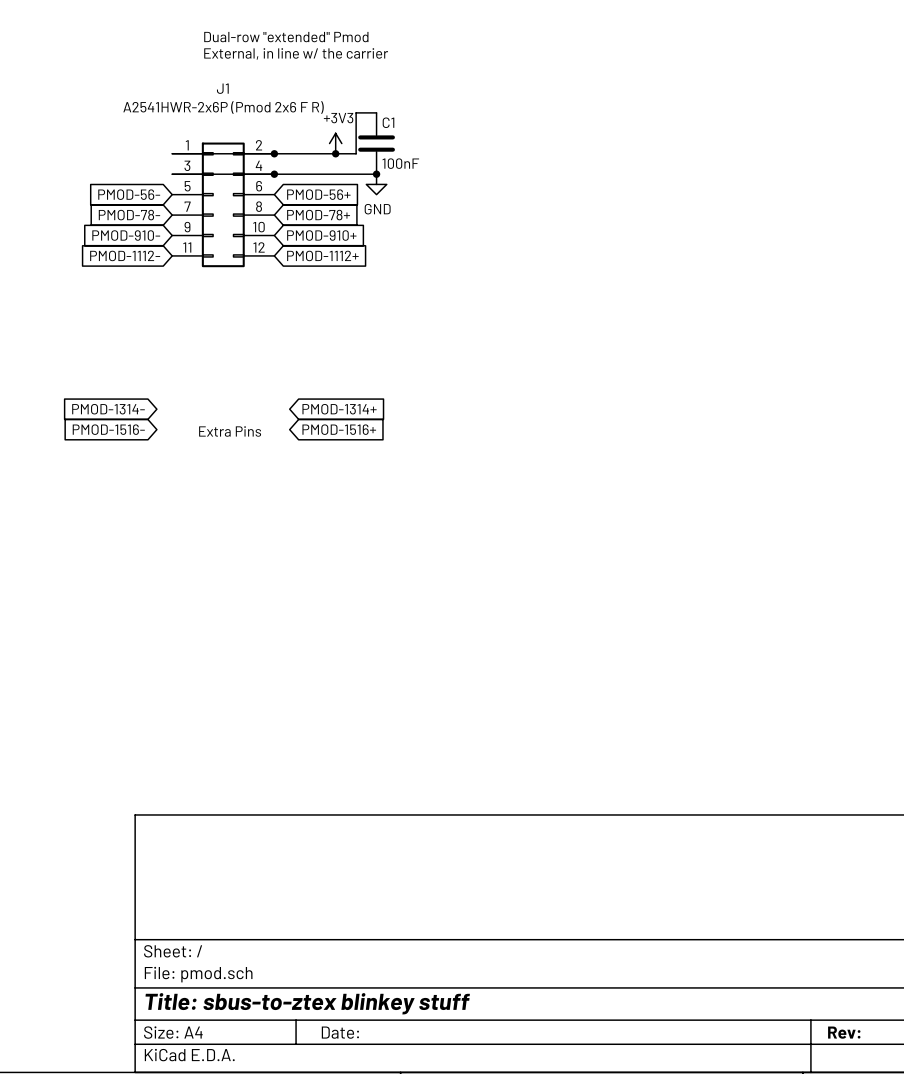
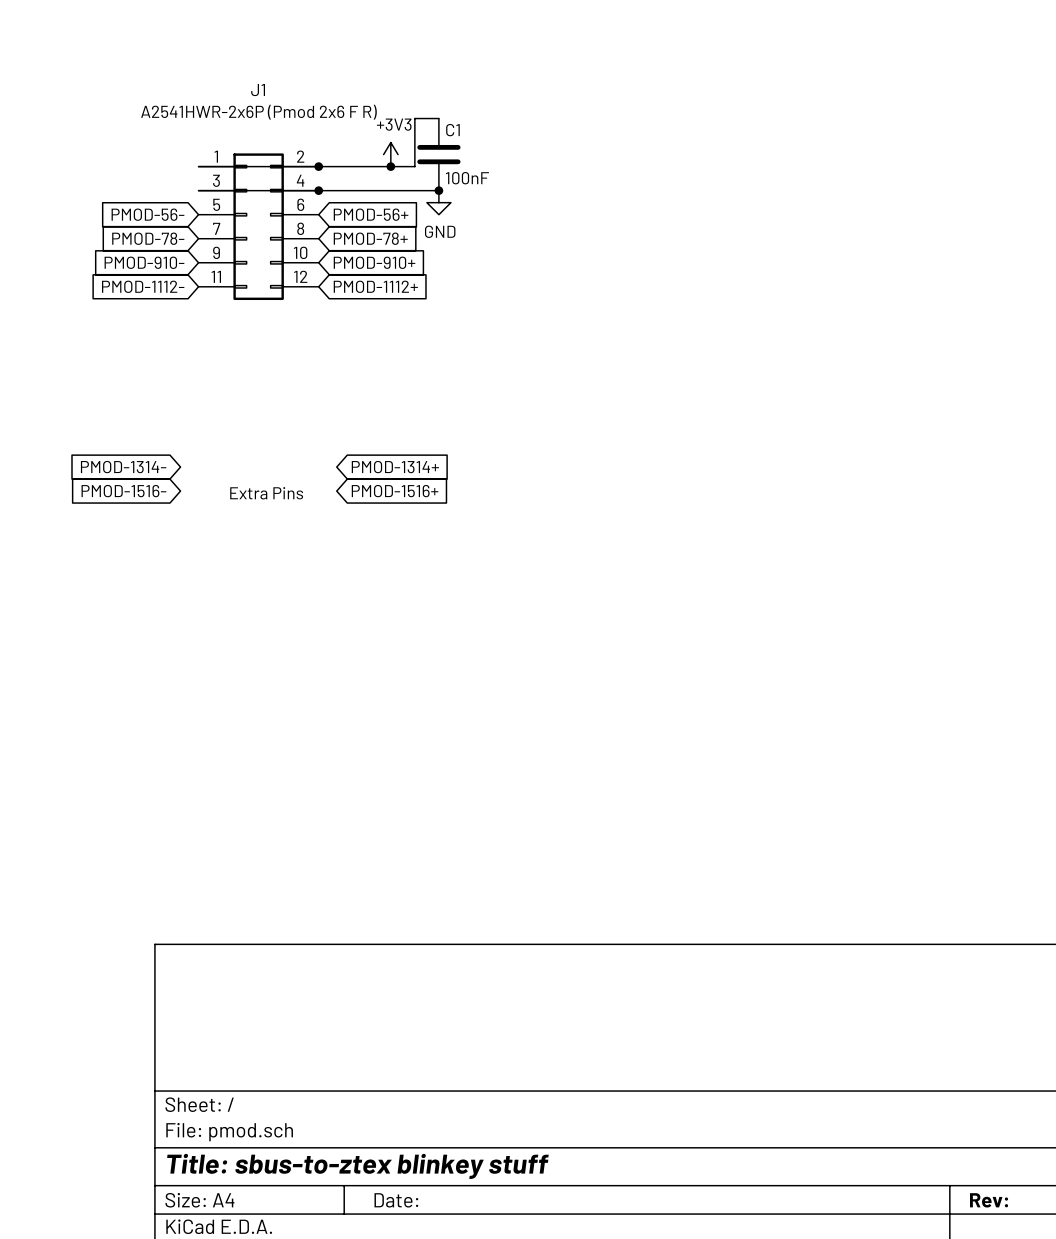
text: Dual-row "extended" Pmod (286, 37) -> none
text: External, in line w/ the carrier (296, 53) -> none

